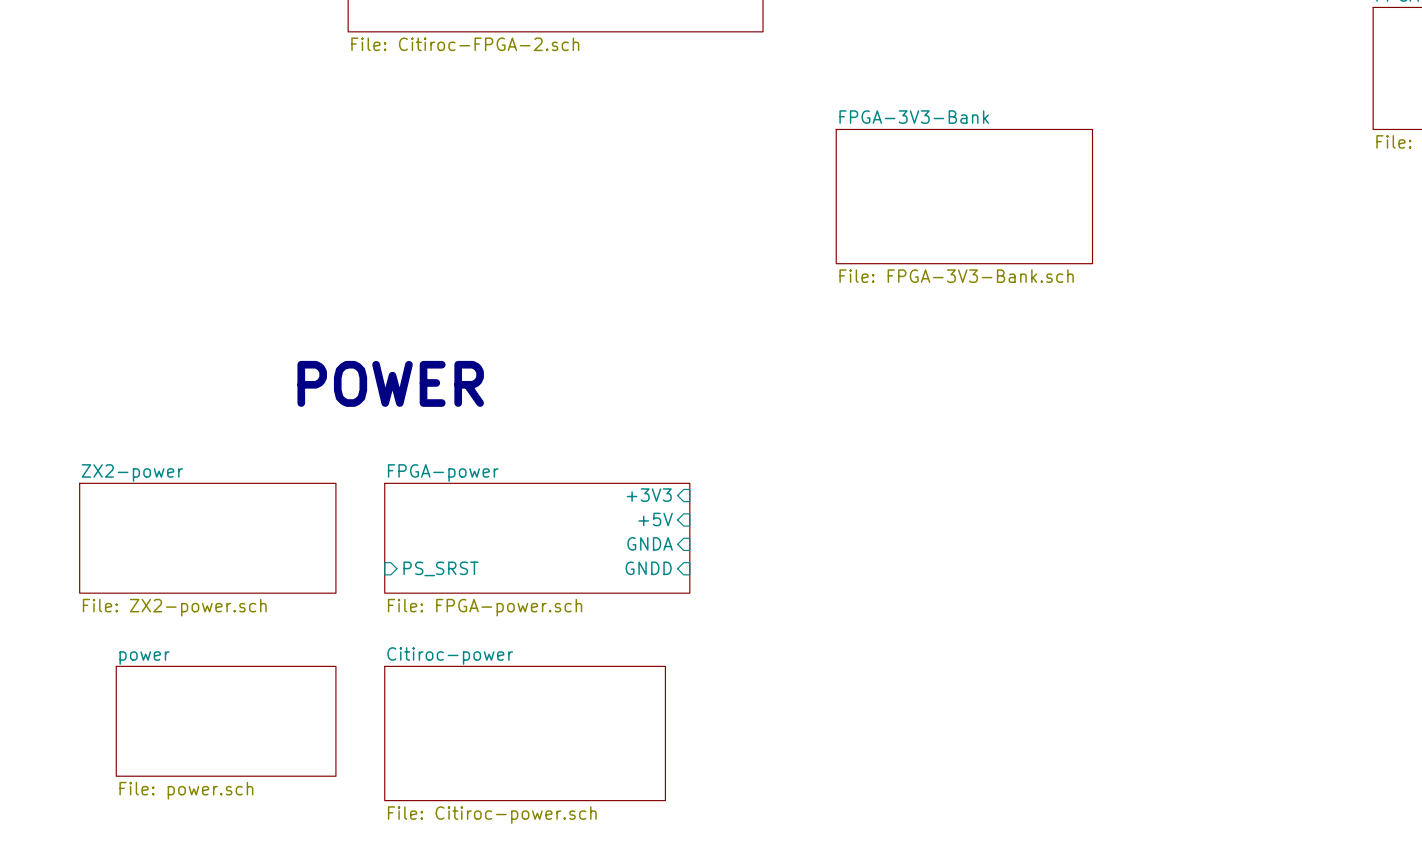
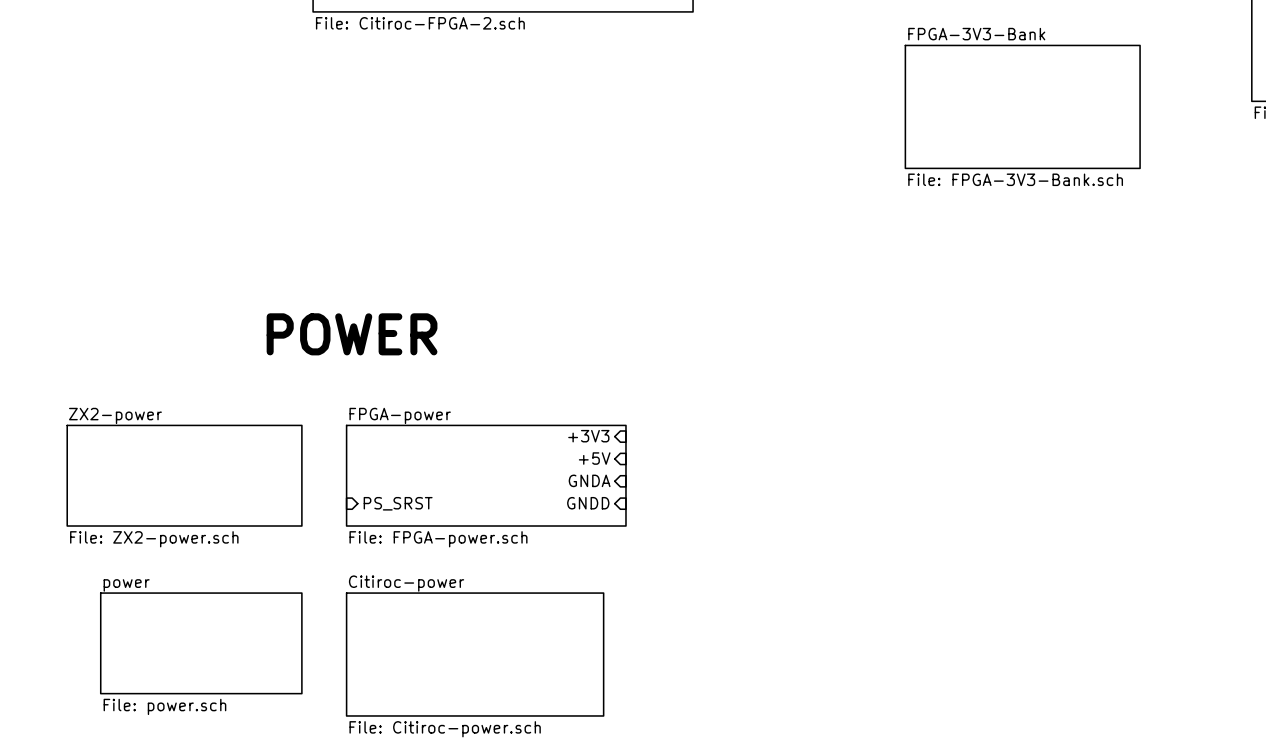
sheet FPGA-3V3-Bank position: (964, 196) -> (1022, 106)

